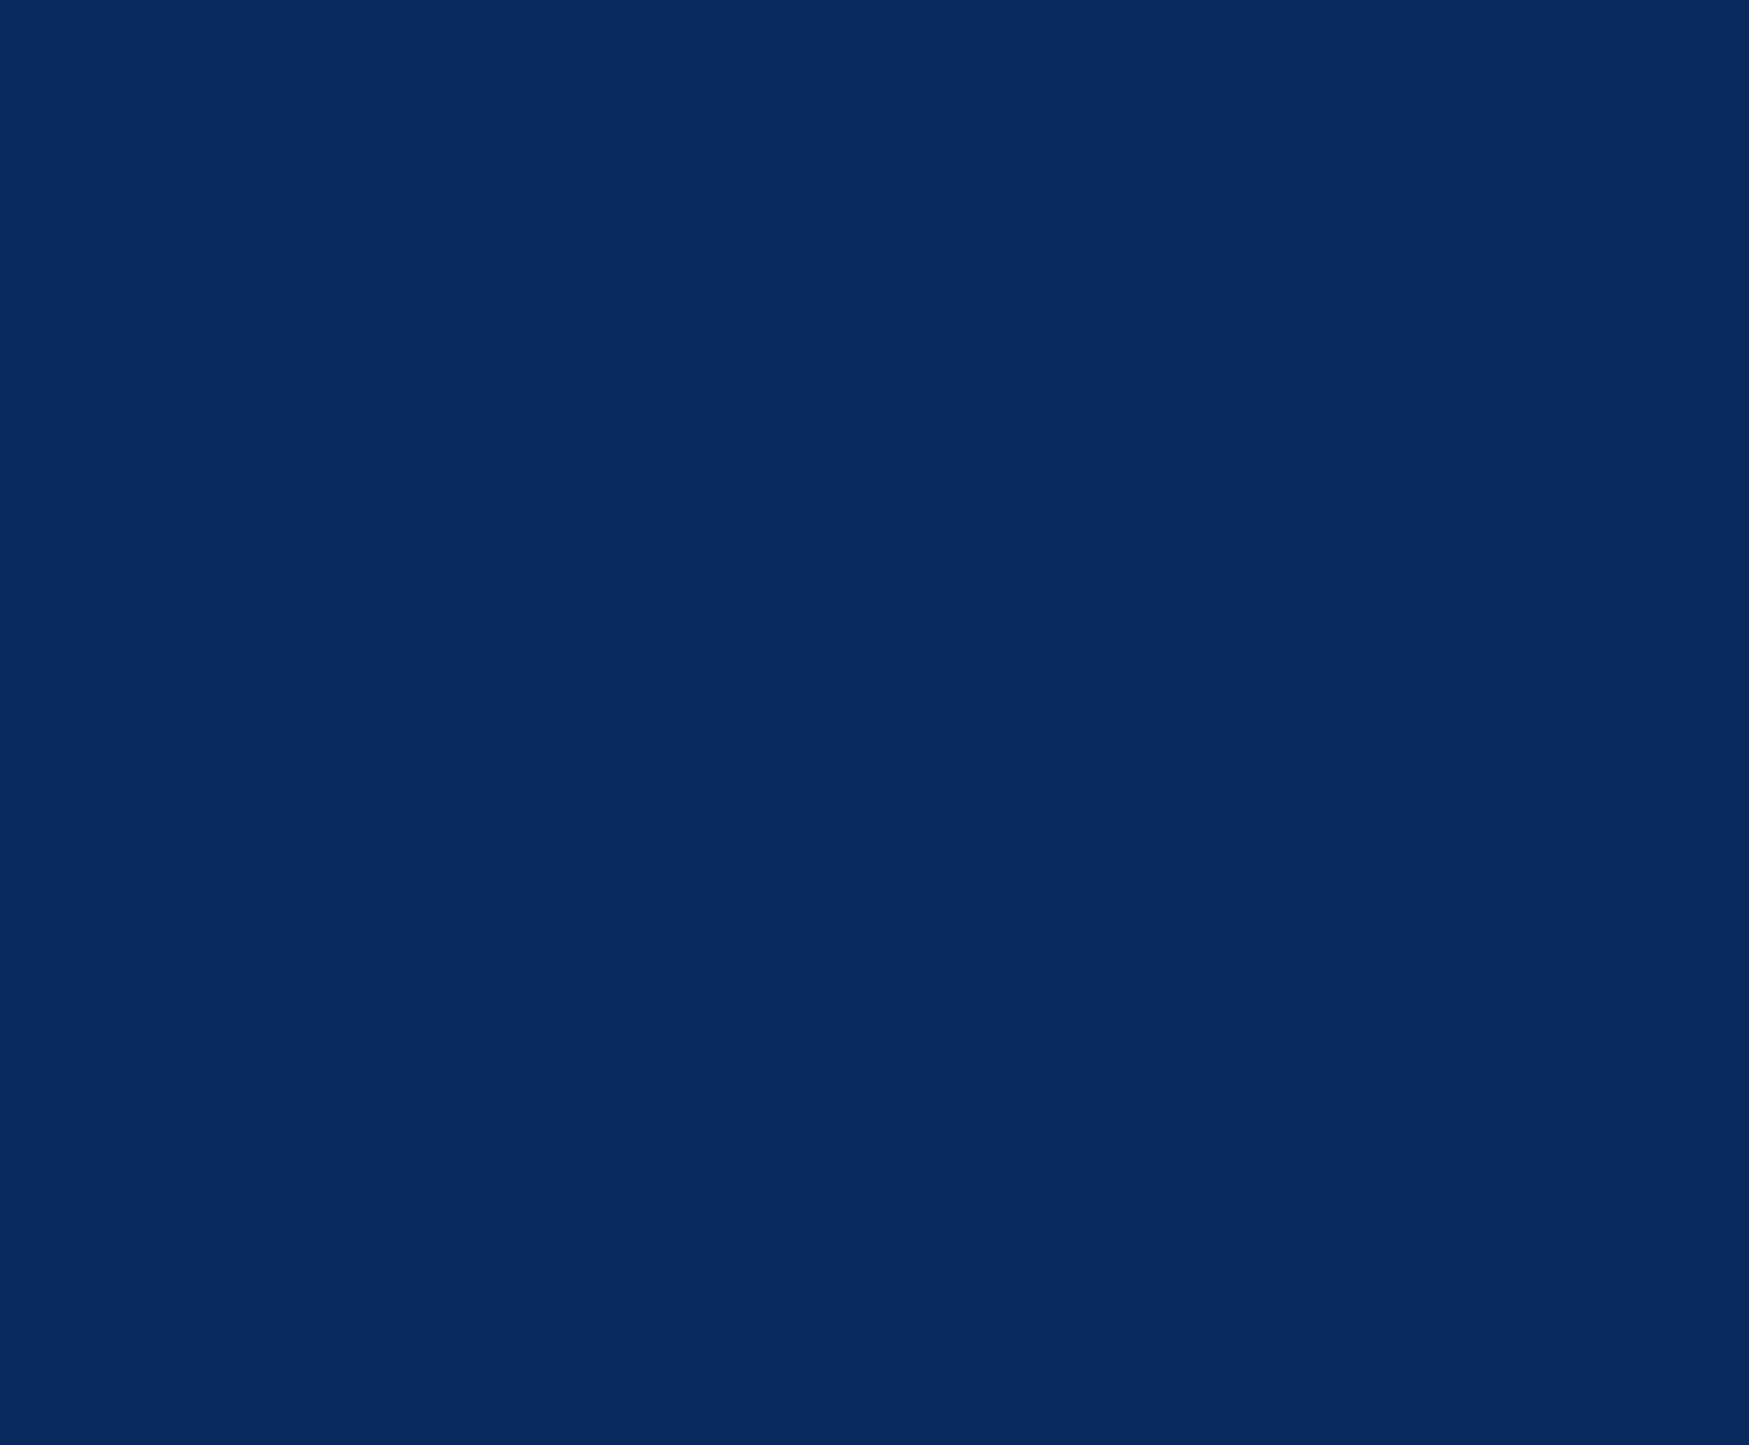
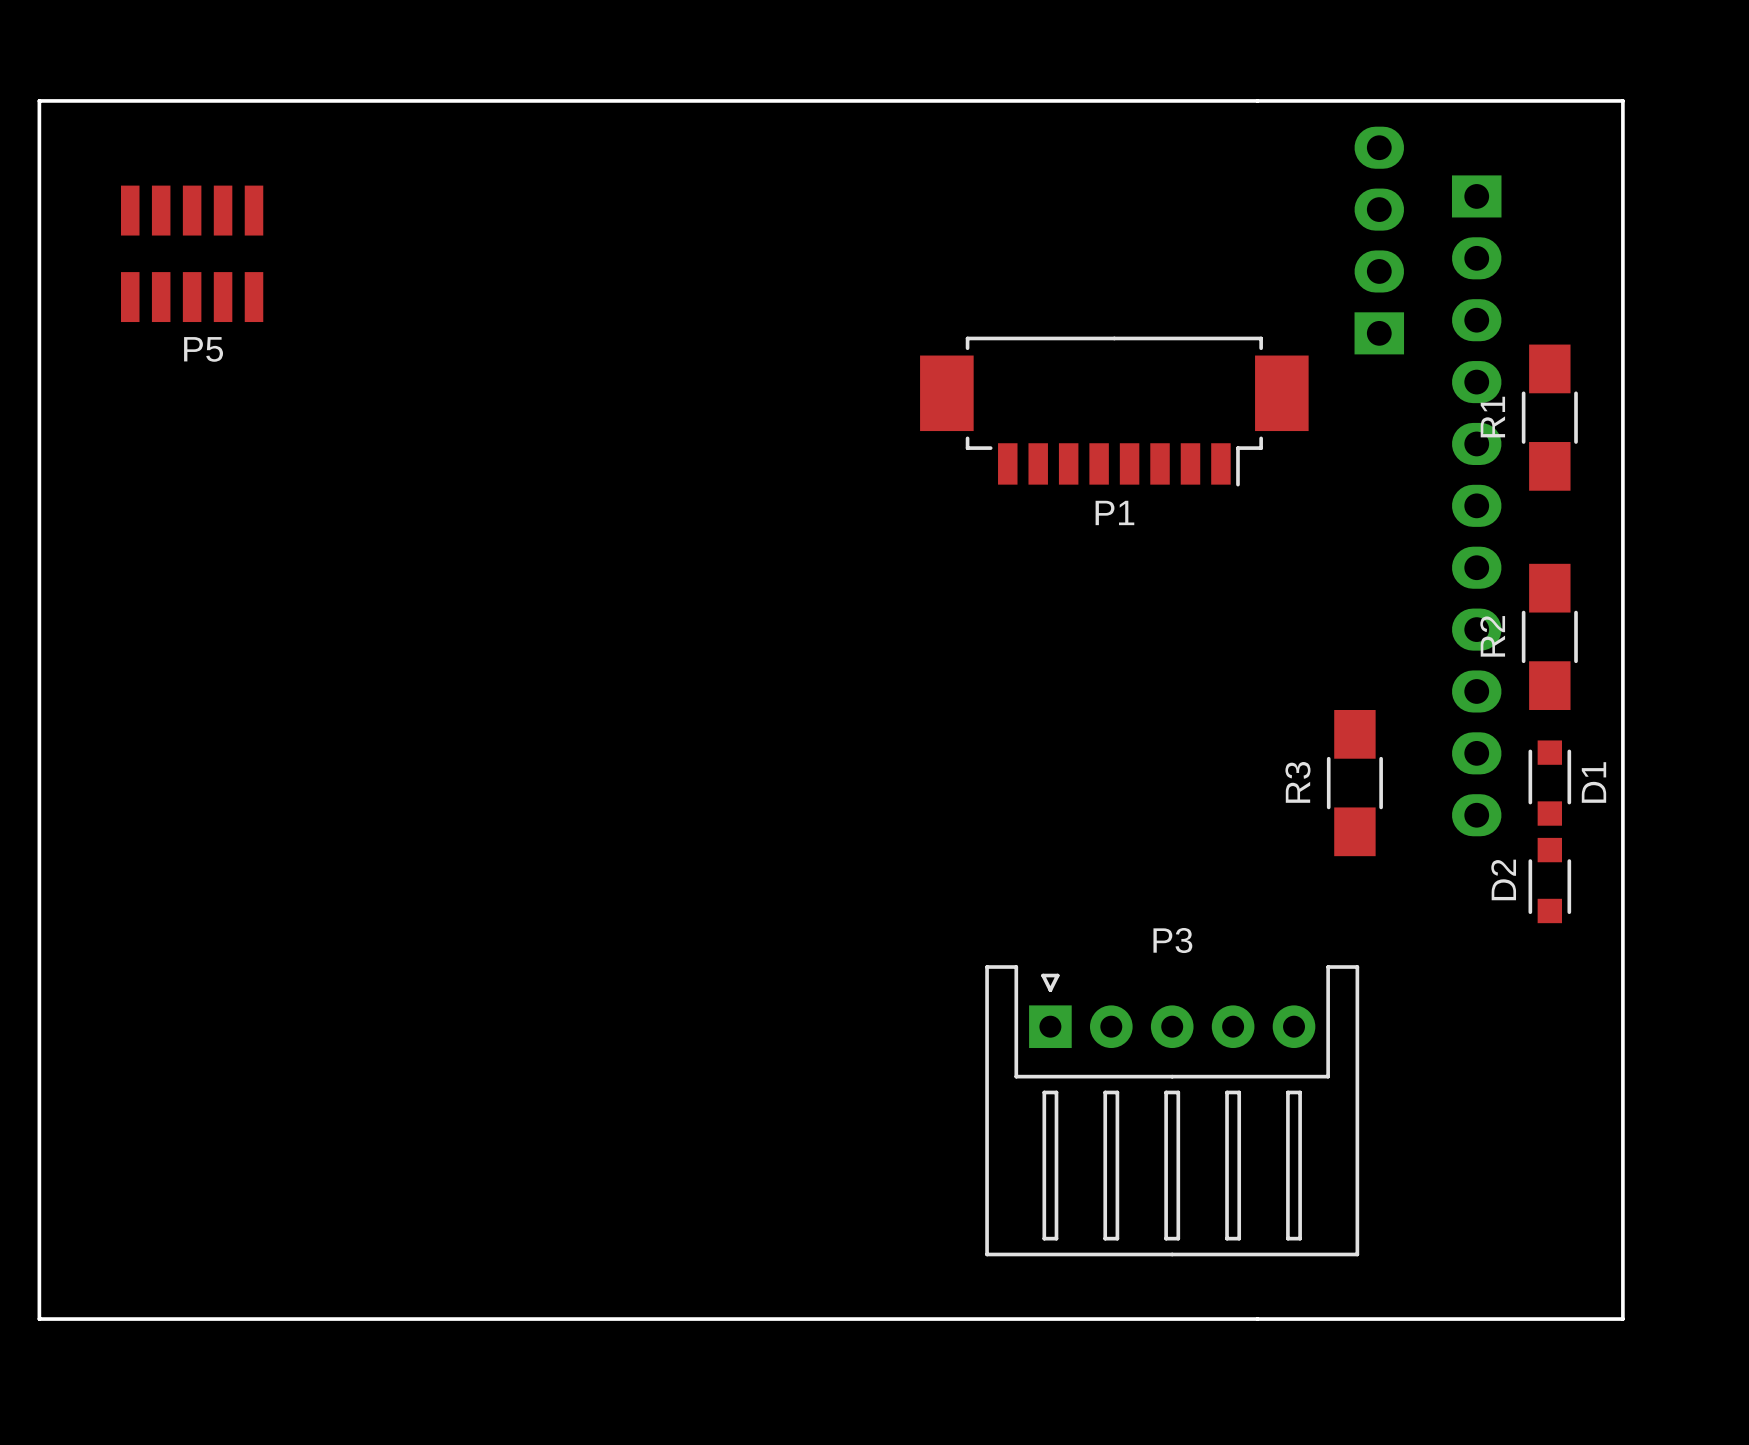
board edge: none -> (39, 100) (1622, 100) (1622, 1319) (39, 1319) (39, 100)
part: none -> (1379, 240)
P5: none -> (192, 253)
P1: none -> (1114, 411)
R1: none -> (1549, 417)
part: none -> (1476, 505)
R2: none -> (1549, 636)
R3: none -> (1354, 783)
D1: none -> (1549, 783)
D2: none -> (1549, 880)
P3: none -> (1172, 1110)

